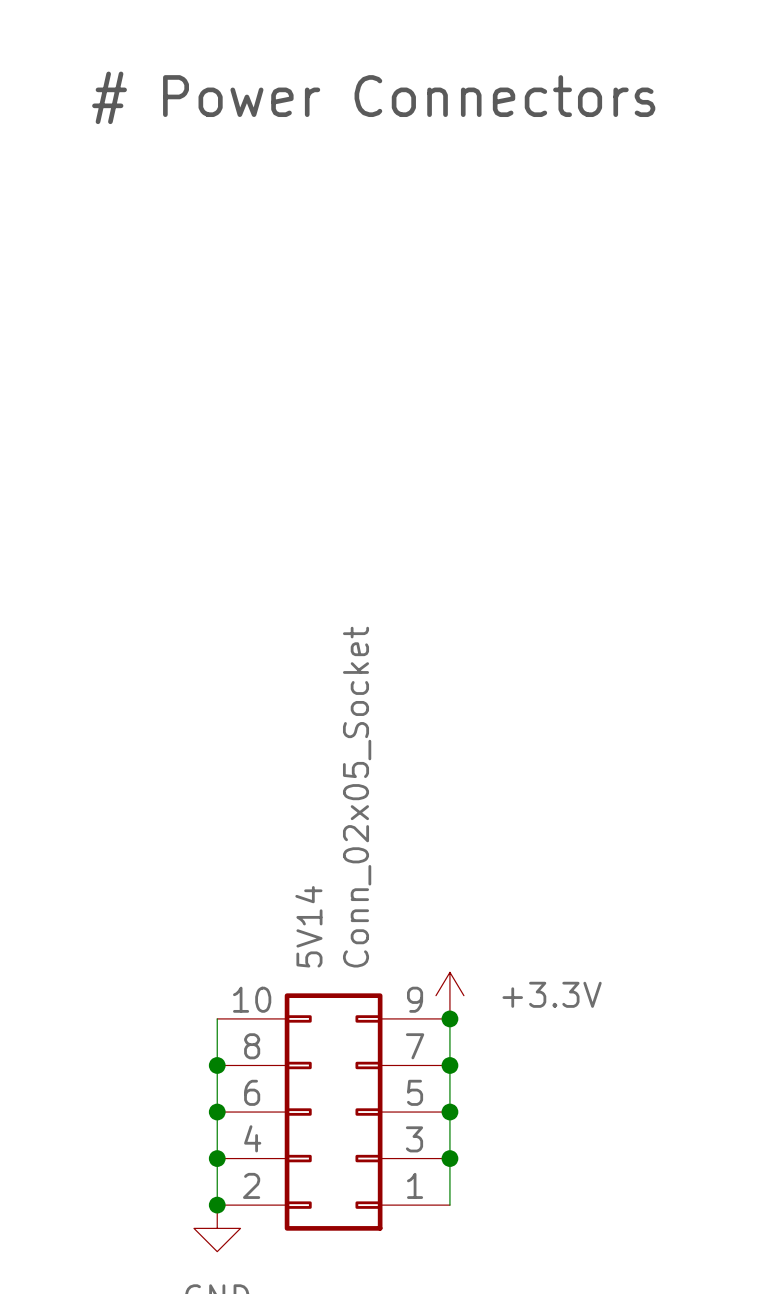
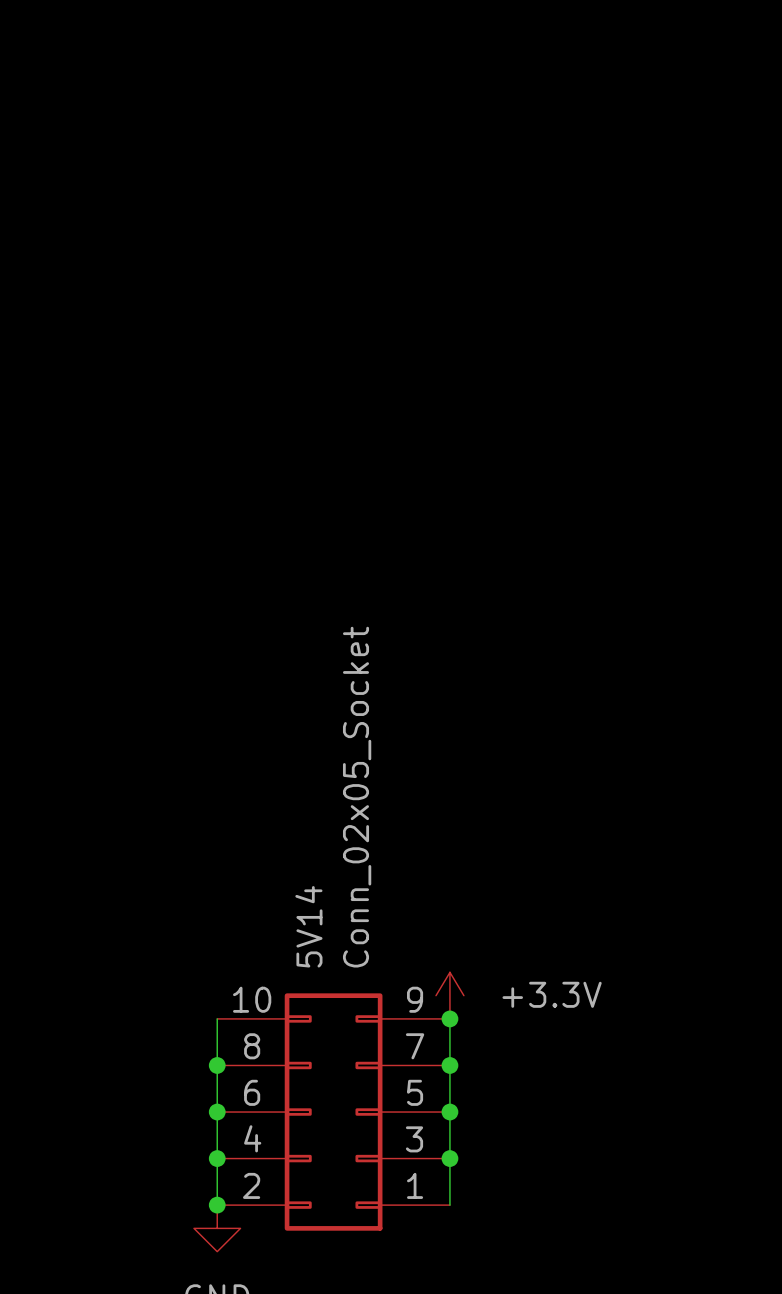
text: # Power Connectors (373, 97) -> none

